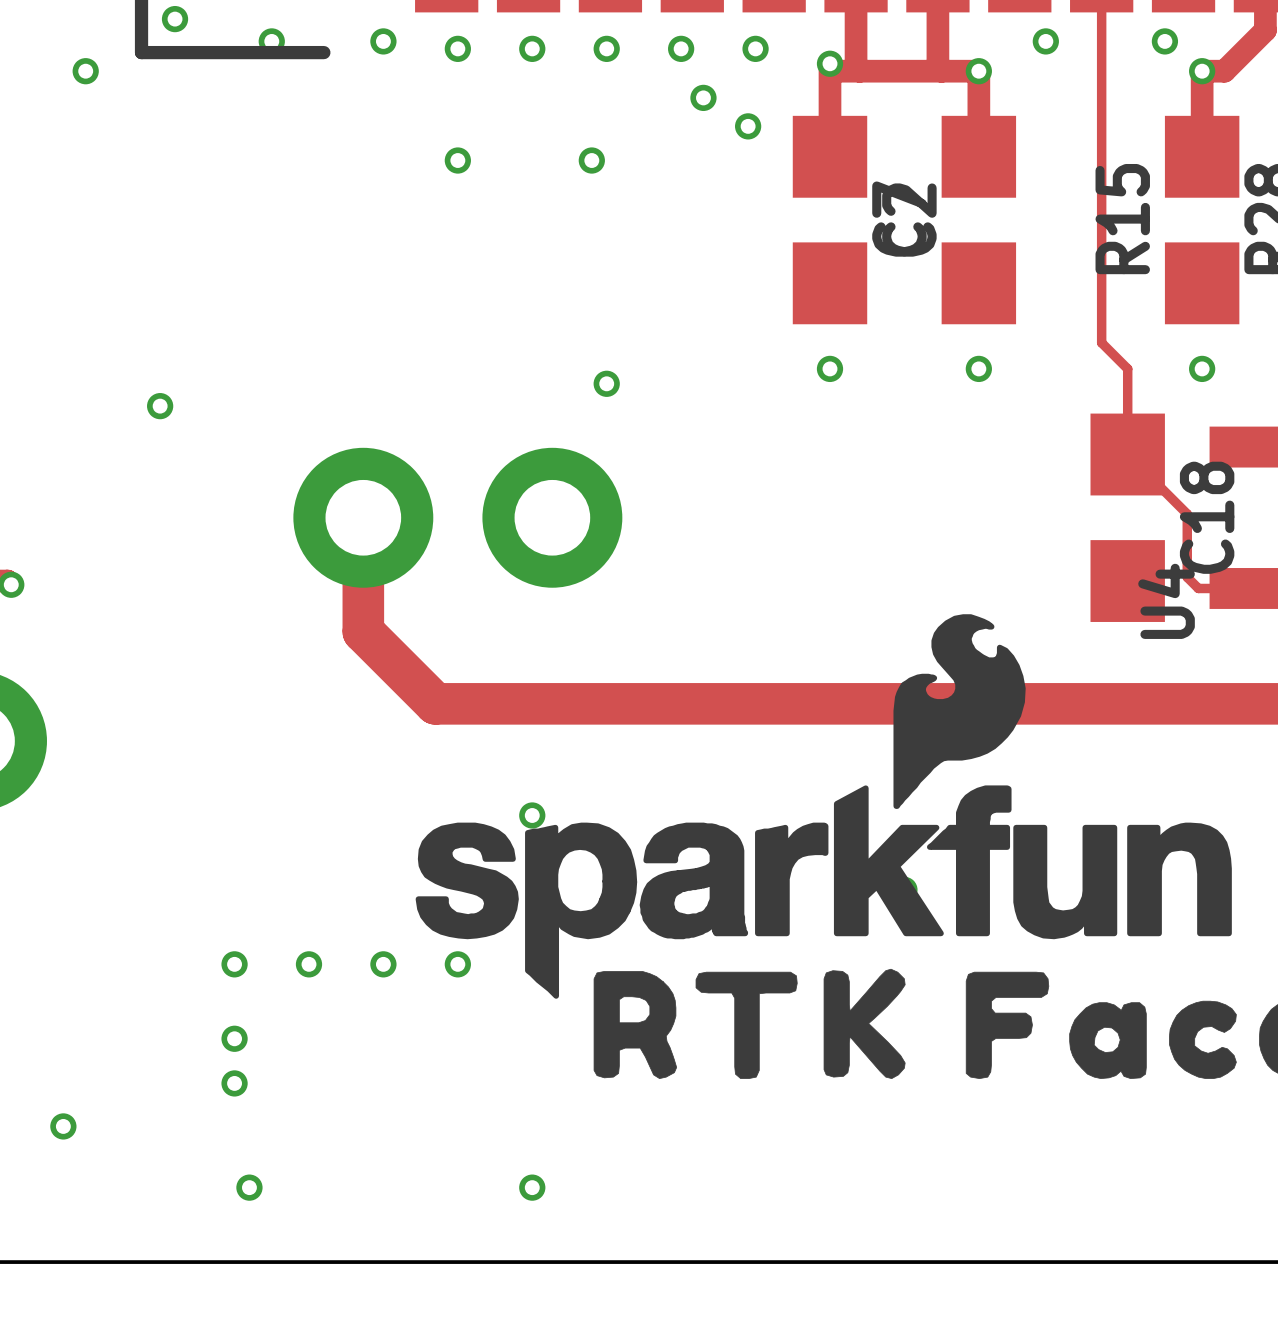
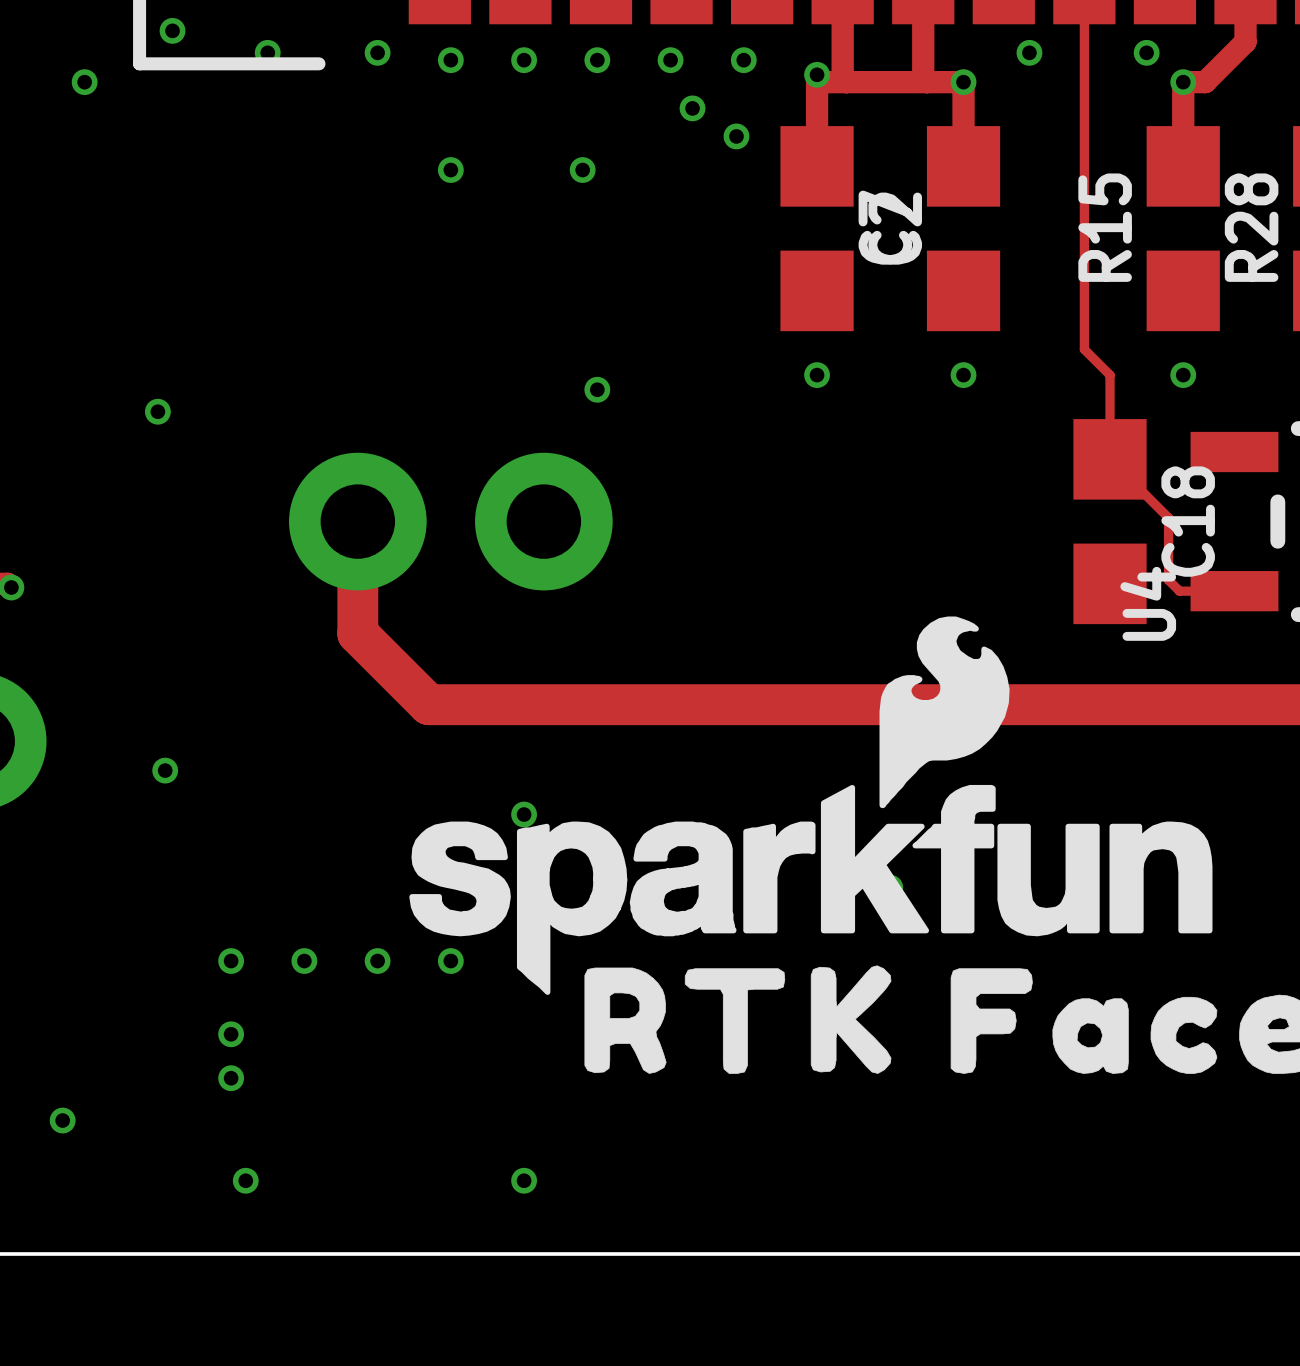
via: none -> (165, 770)

